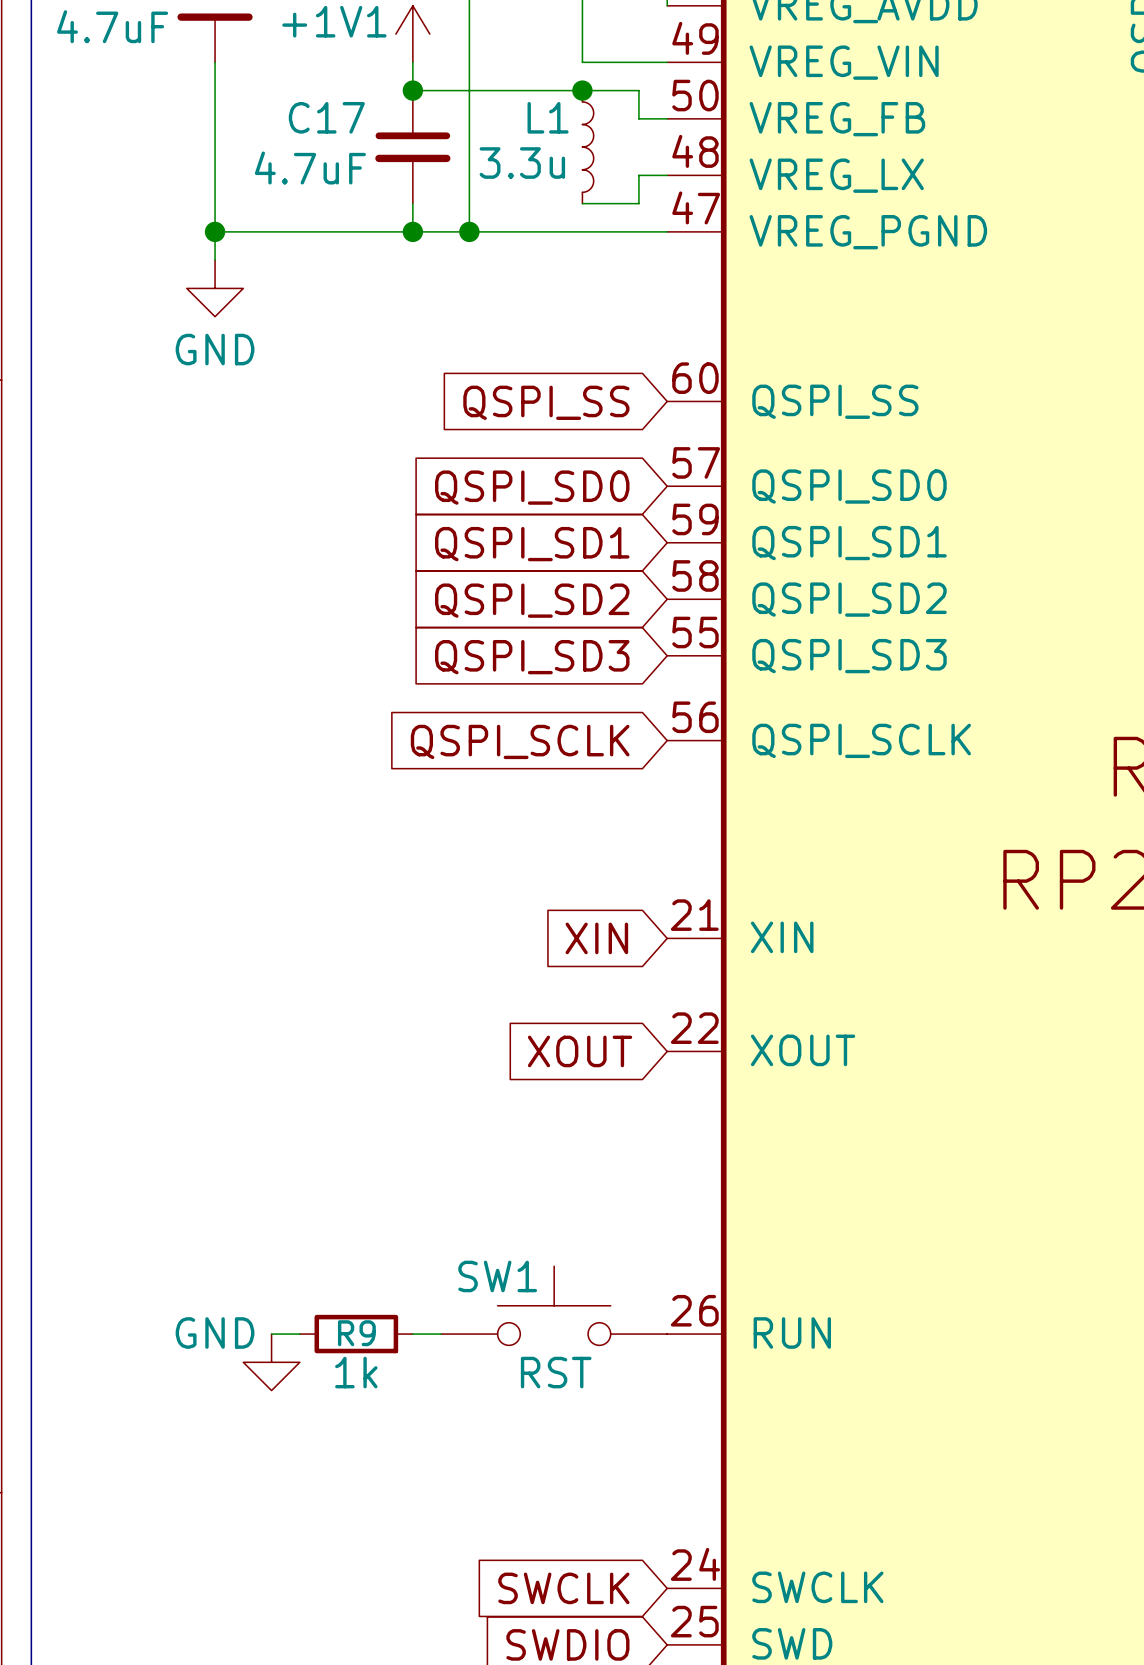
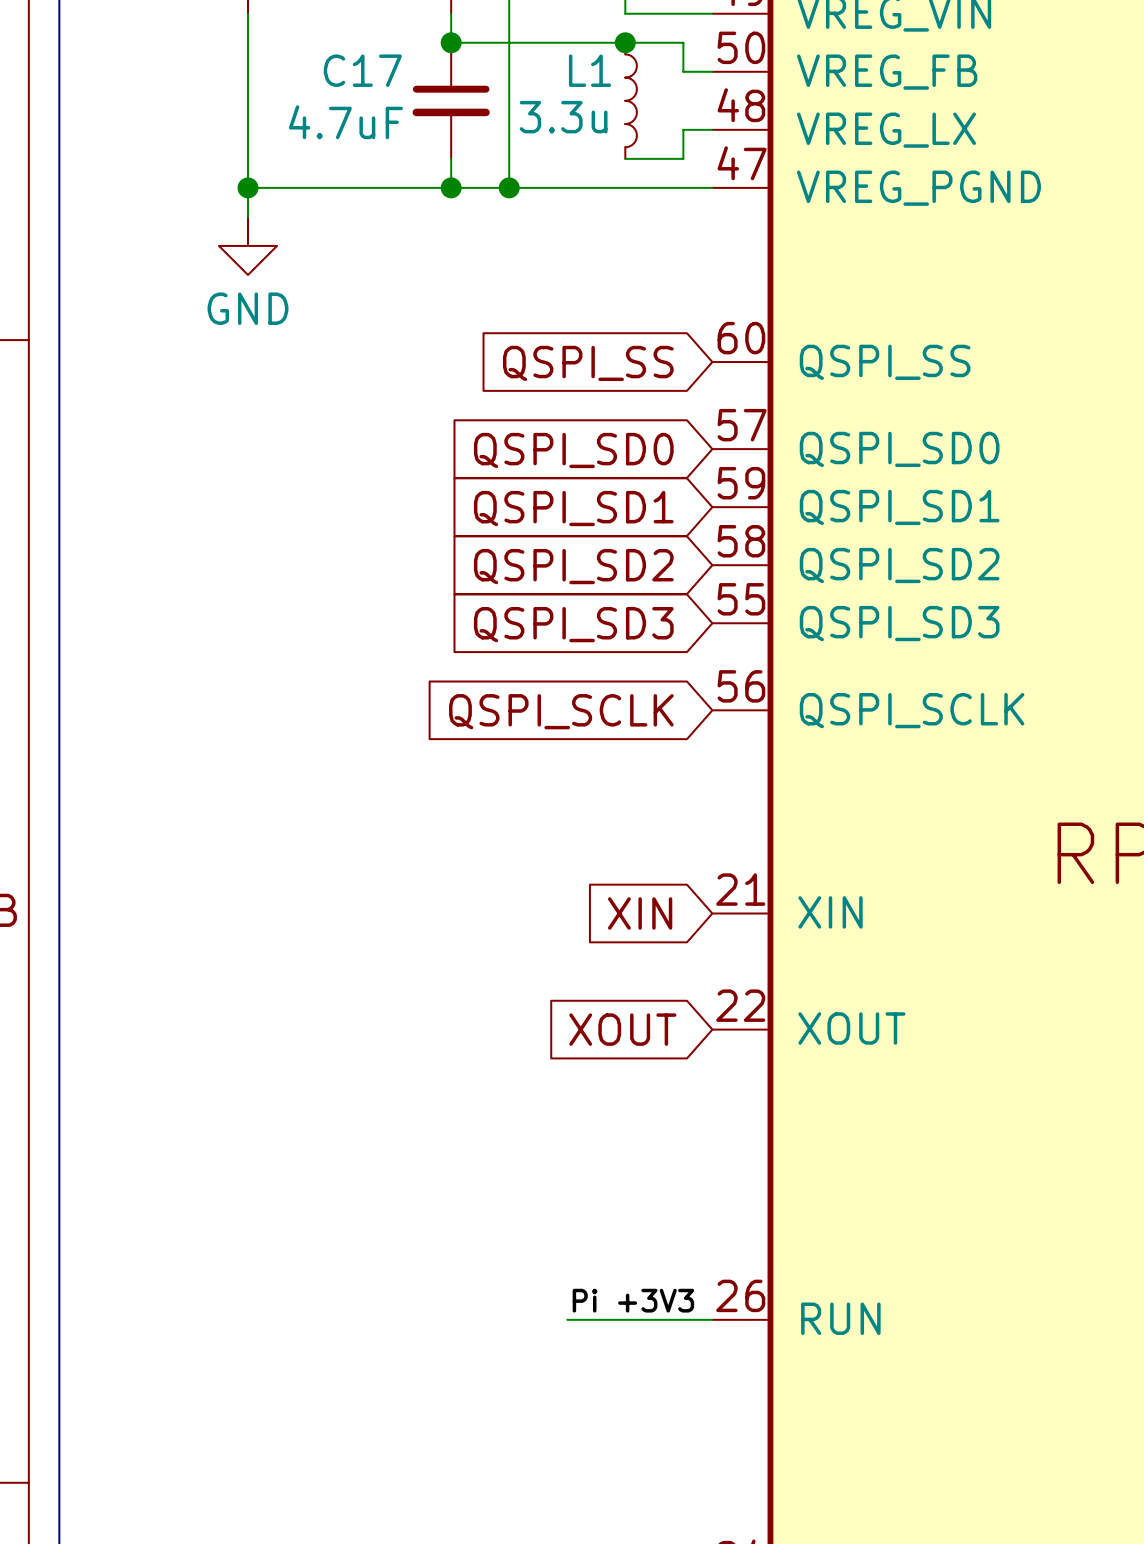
SW1: RST (554, 1305) -> none
label: none -> Pi +3V3 (633, 1300)
wire: (271, 1334) (299, 1334) -> none
R9: 1k (356, 1334) -> none
wire: (412, 1334) (441, 1334) -> none
wire: none -> (567, 1319) (712, 1319)
power symbol: GND (271, 1362) -> none

